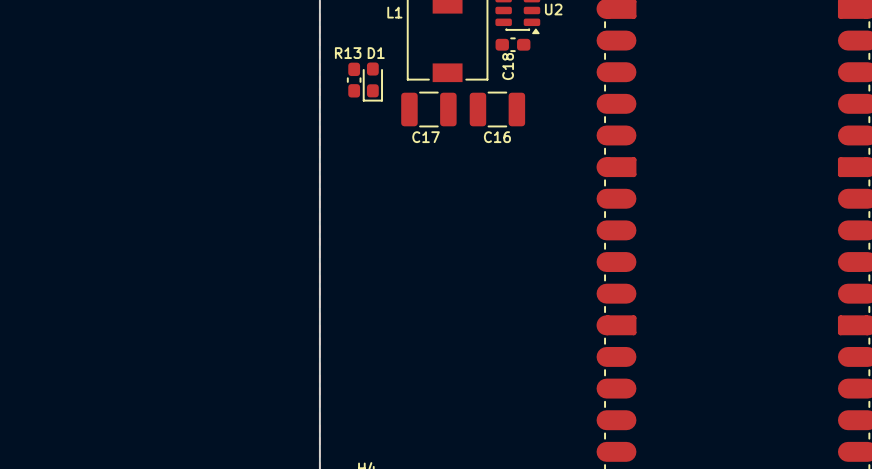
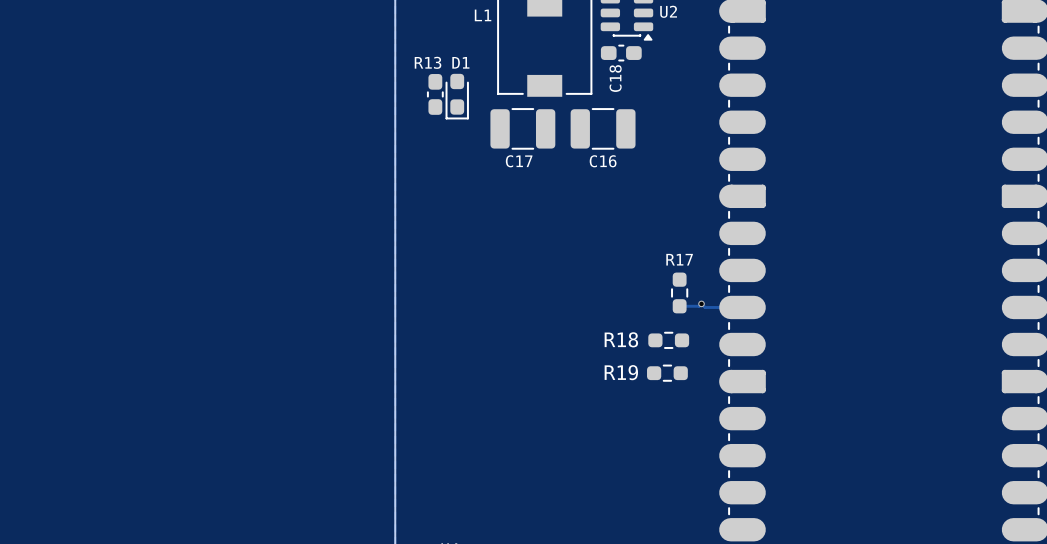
R17: none -> (679, 292)
via: none -> (701, 303)
track: none -> (679, 306) (699, 306) (701, 303) (705, 307) (742, 307)
R18: none -> (668, 340)
R19: none -> (667, 373)

